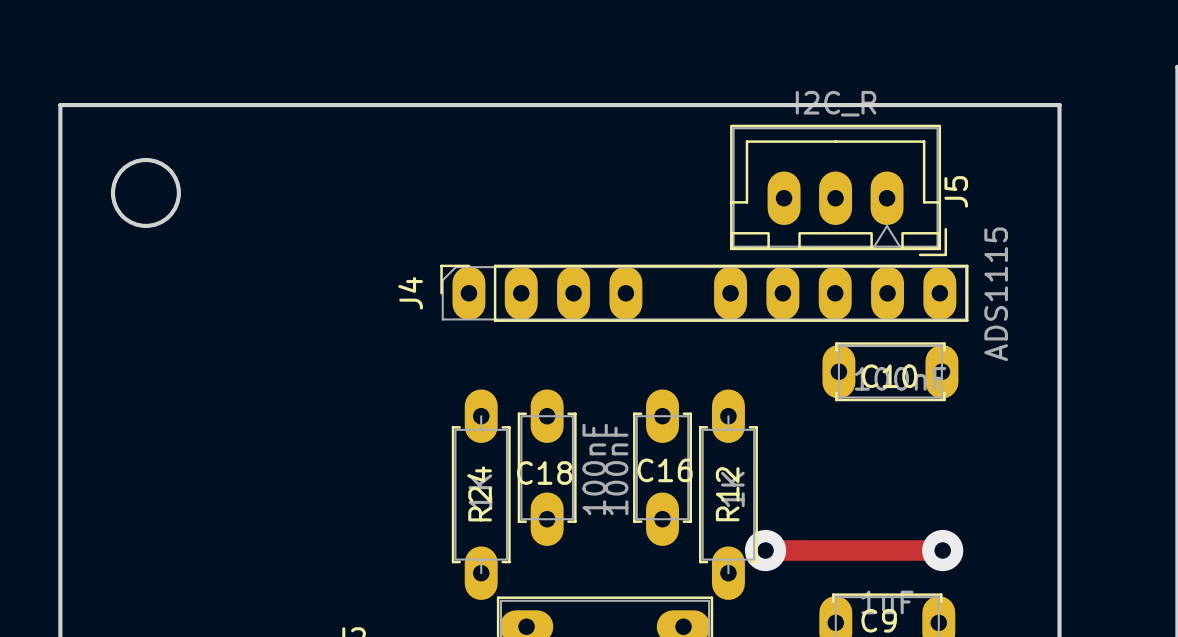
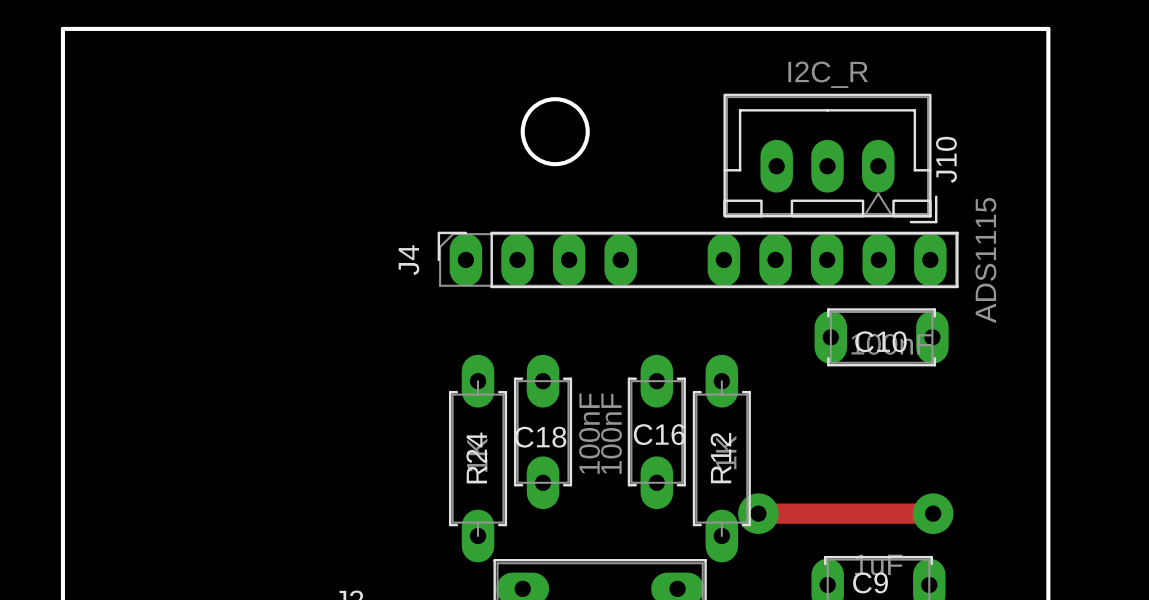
board edge: (60, 105) (1059, 105) -> (62, 74) (62, 28) (1048, 28) (1048, 74)
J5 name: J5 (956, 191) -> J10 (946, 159)
round board edge position: (145, 192) -> (555, 131)

